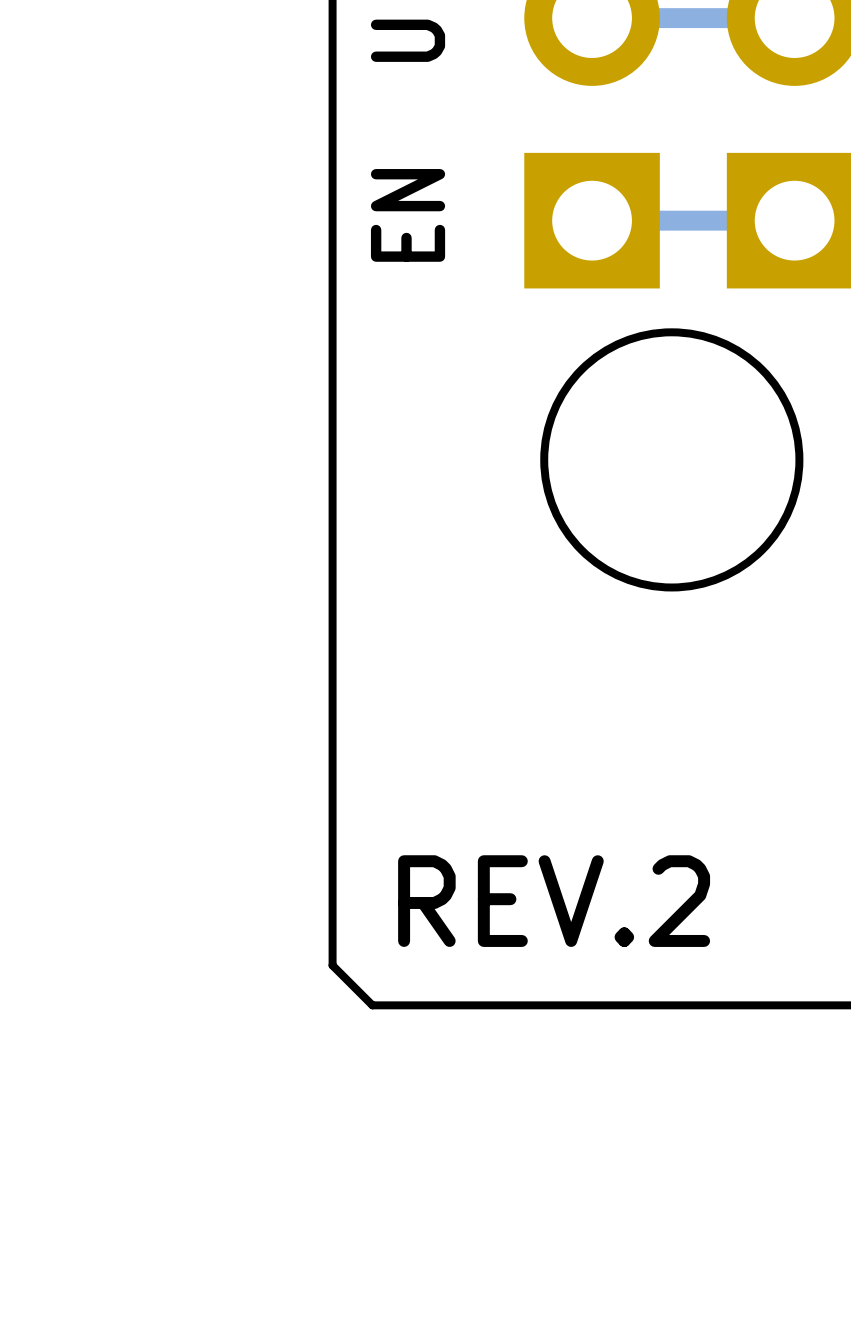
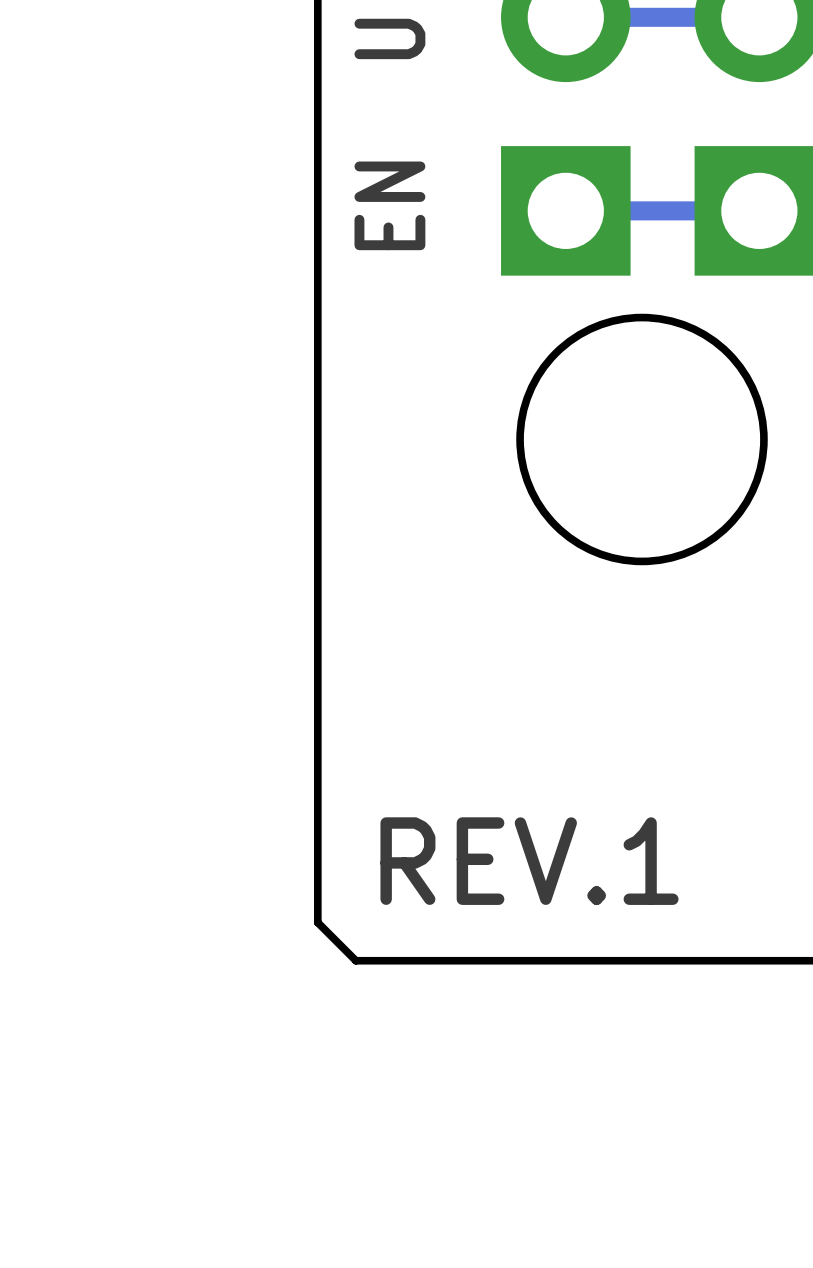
text: REV.2 (554, 901) -> REV.1 (529, 861)

